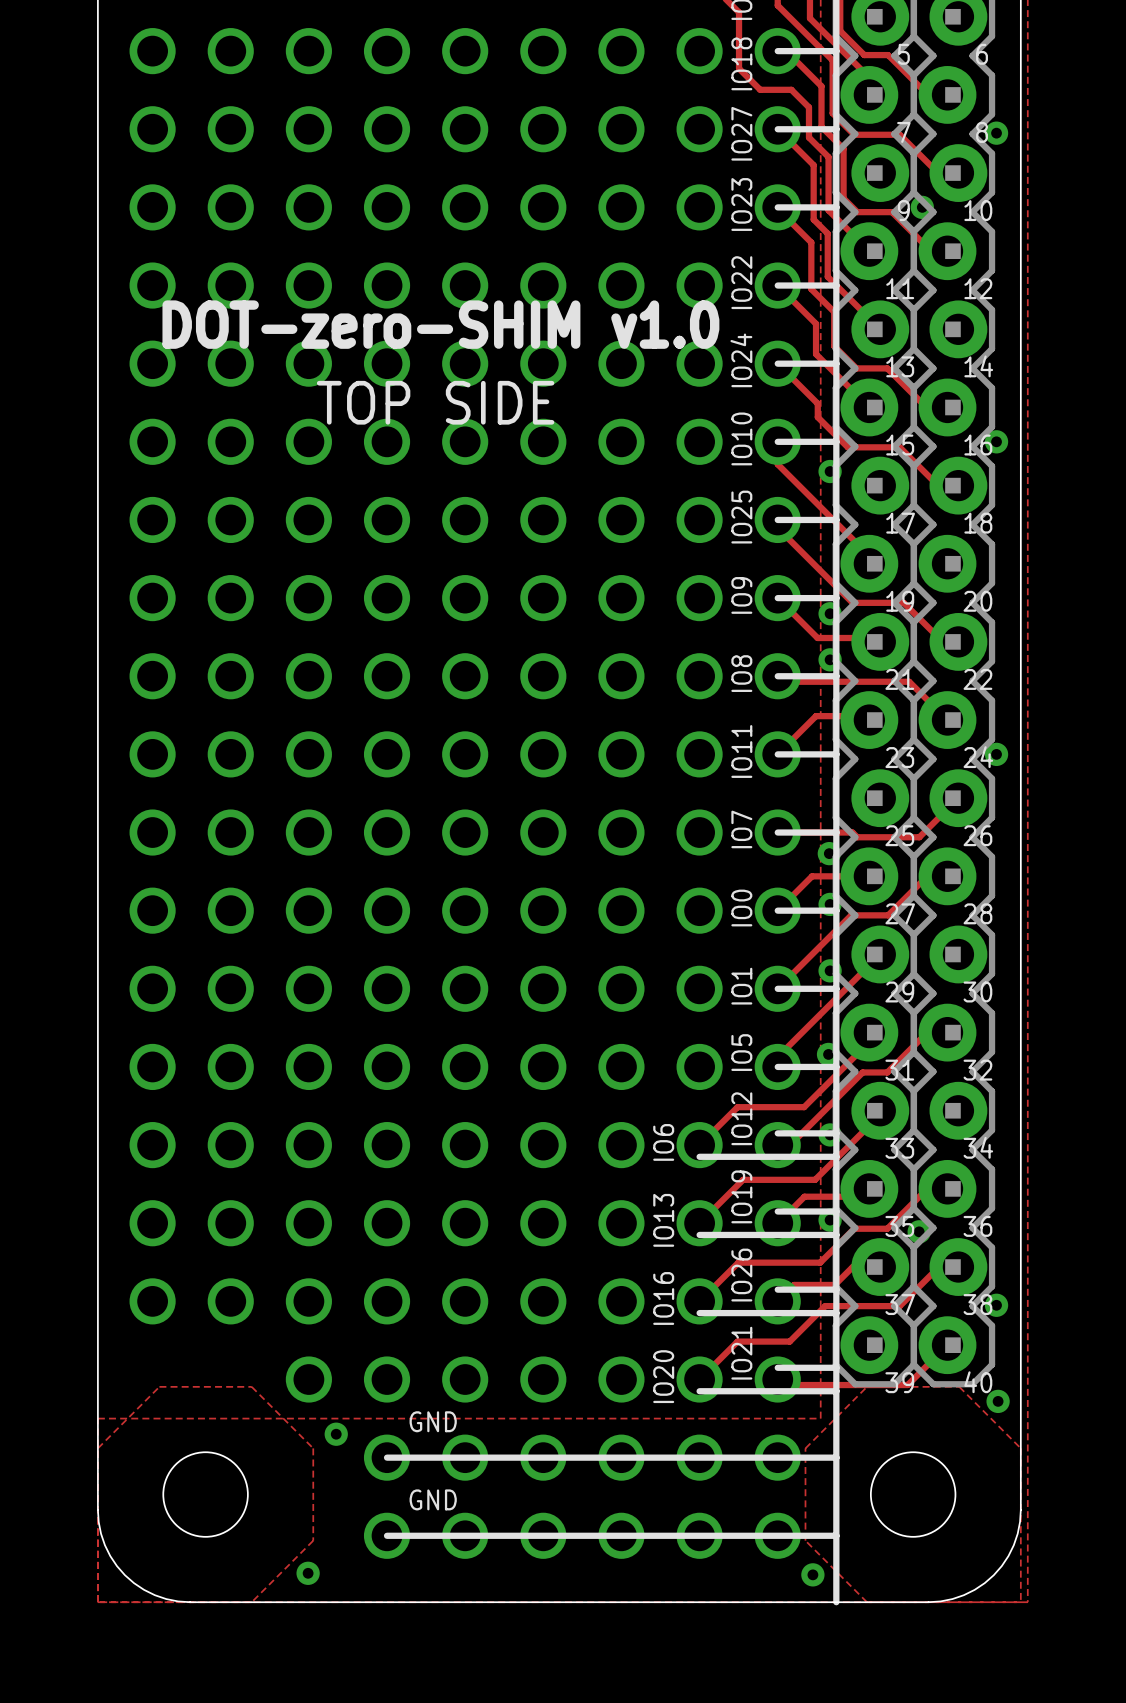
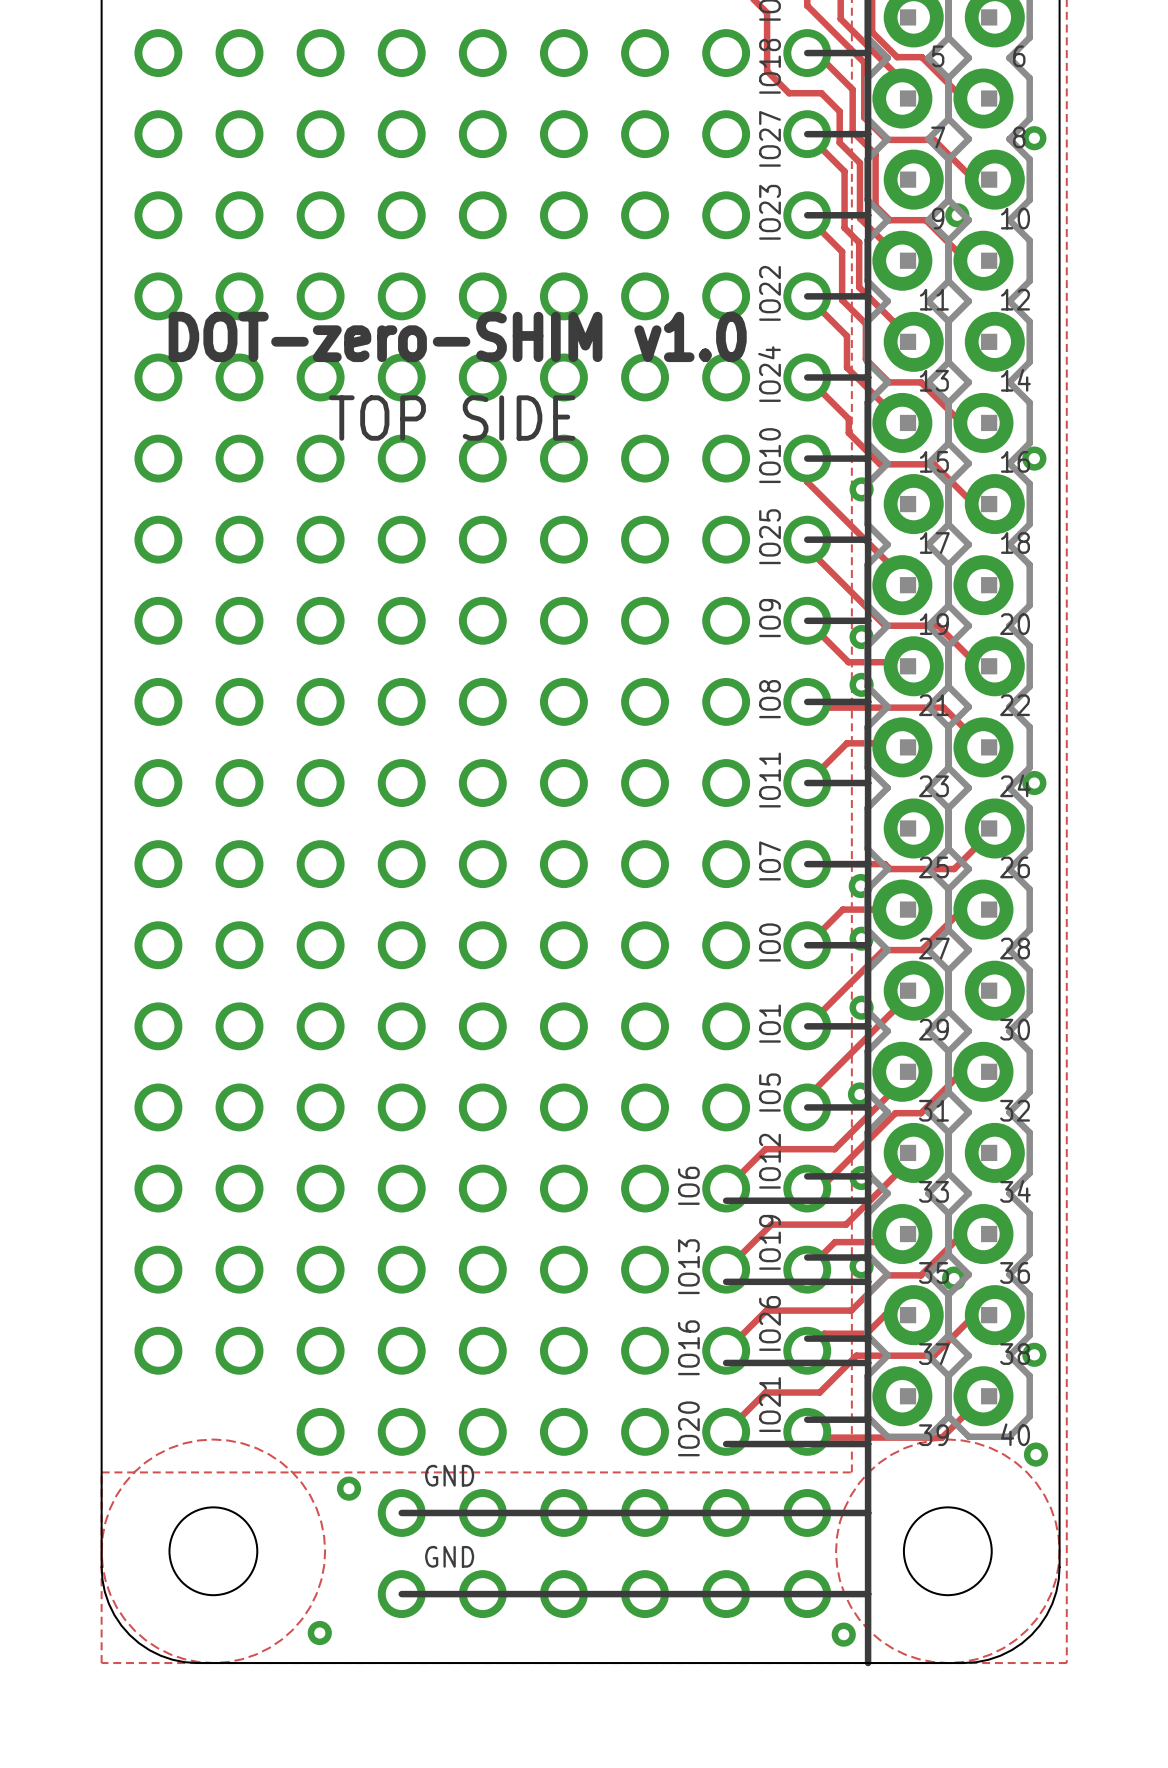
zone outline: none -> (213, 1439) (184, 1443) (170, 1448) (145, 1462) (134, 1472) (124, 1483) (110, 1508) (102, 1536) (101, 1551) (102, 1565) (110, 1594) (124, 1619) (134, 1630) (145, 1639) (170, 1654) (198, 1662) (213, 1663) (242, 1659) (256, 1654) (269, 1648) (292, 1630) (302, 1619) (316, 1594) (321, 1580) (325, 1551) (324, 1536) (316, 1508) (302, 1483) (292, 1472) (269, 1454) (256, 1448) (242, 1443) (213, 1439)
zone outline: none -> (947, 1439) (933, 1440) (905, 1448) (879, 1462) (868, 1472) (859, 1483) (844, 1508) (837, 1536) (836, 1551) (837, 1565) (844, 1594) (851, 1607) (868, 1630) (879, 1639) (905, 1654) (933, 1662) (947, 1663) (962, 1662) (990, 1654) (1015, 1639) (1026, 1630) (1036, 1619) (1051, 1594) (1058, 1565) (1059, 1551) (1058, 1536) (1051, 1508) (1044, 1495) (1026, 1472) (1015, 1462) (990, 1448) (976, 1443) (947, 1439)
zone outline: (97, 1448) (159, 1386) (251, 1386) (313, 1448) (313, 1540) (251, 1602) -> none
zone outline: (867, 1602) (805, 1540) (805, 1448) (867, 1386) (959, 1386) (1020, 1448) (1020, 1602) -> none

